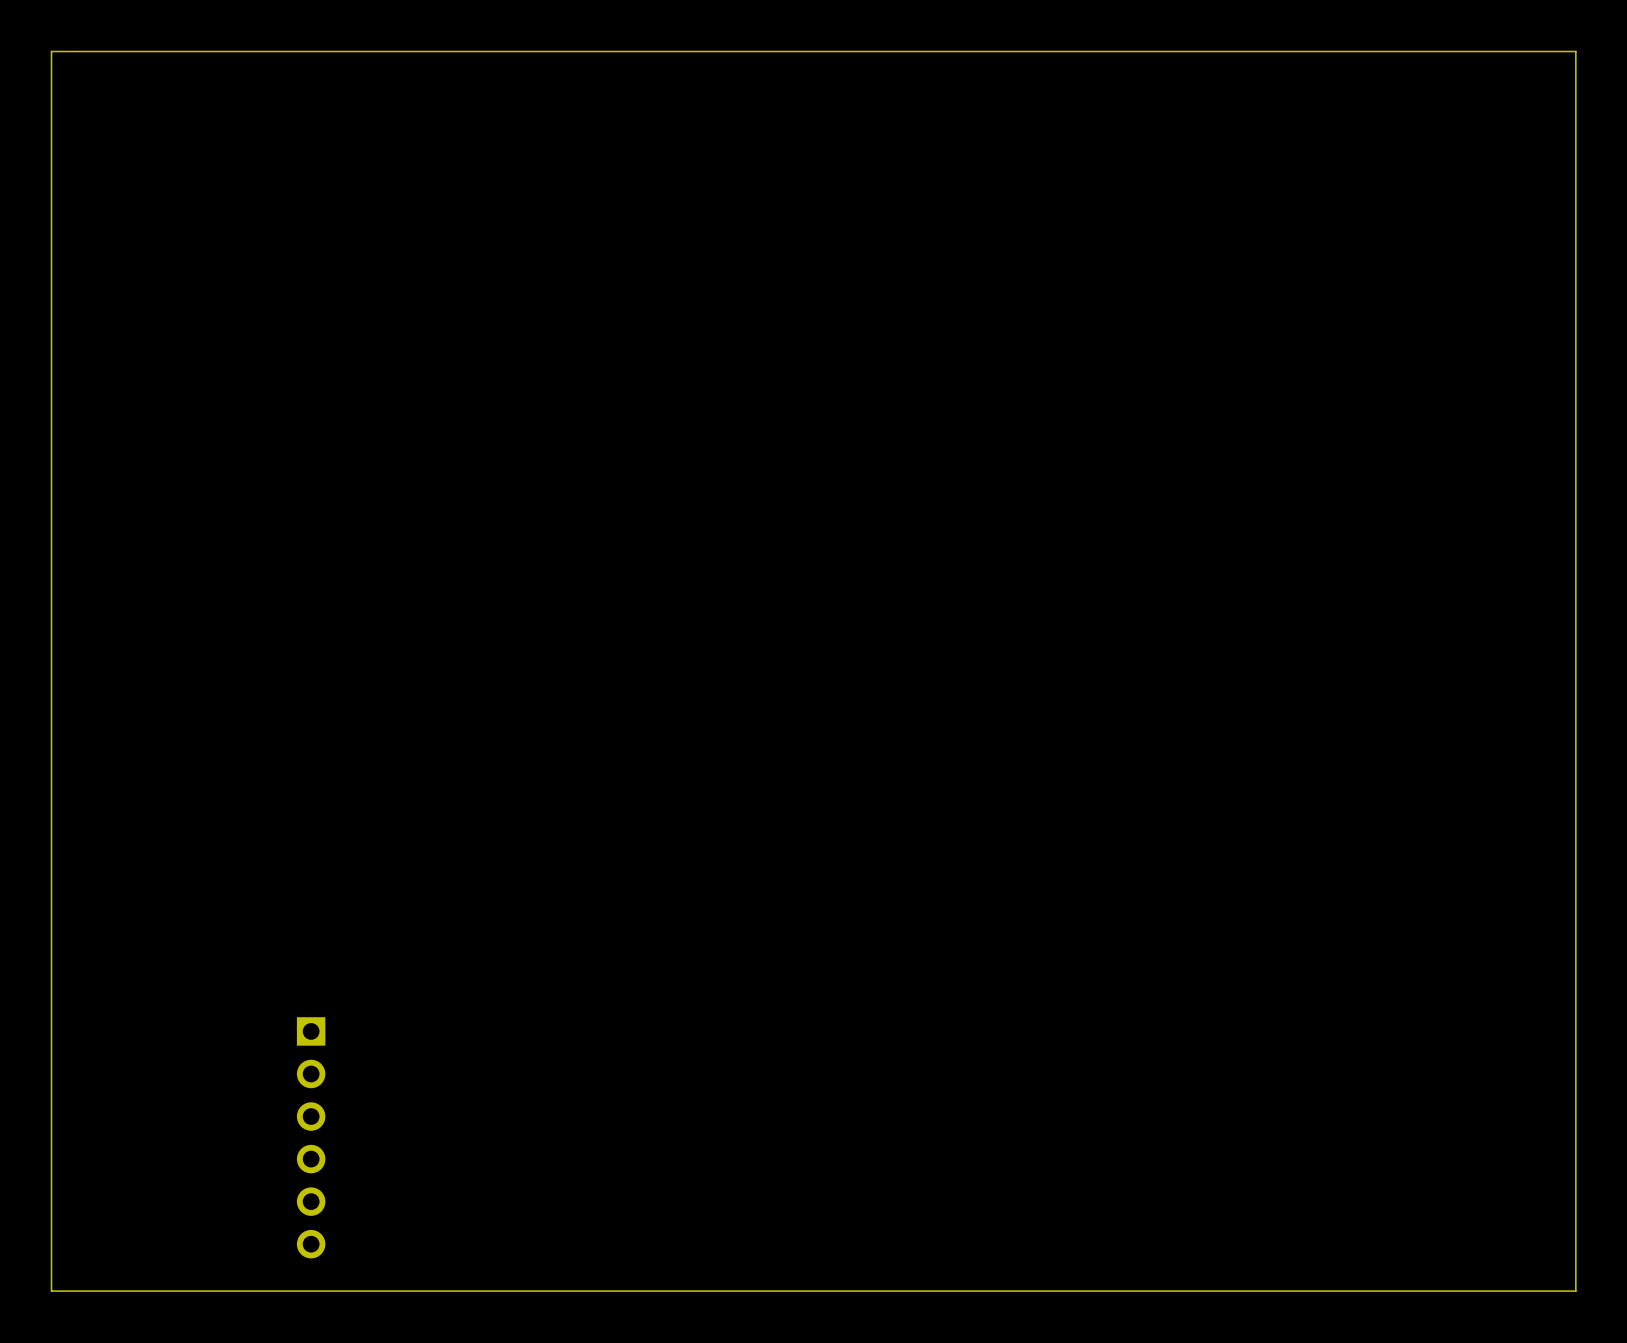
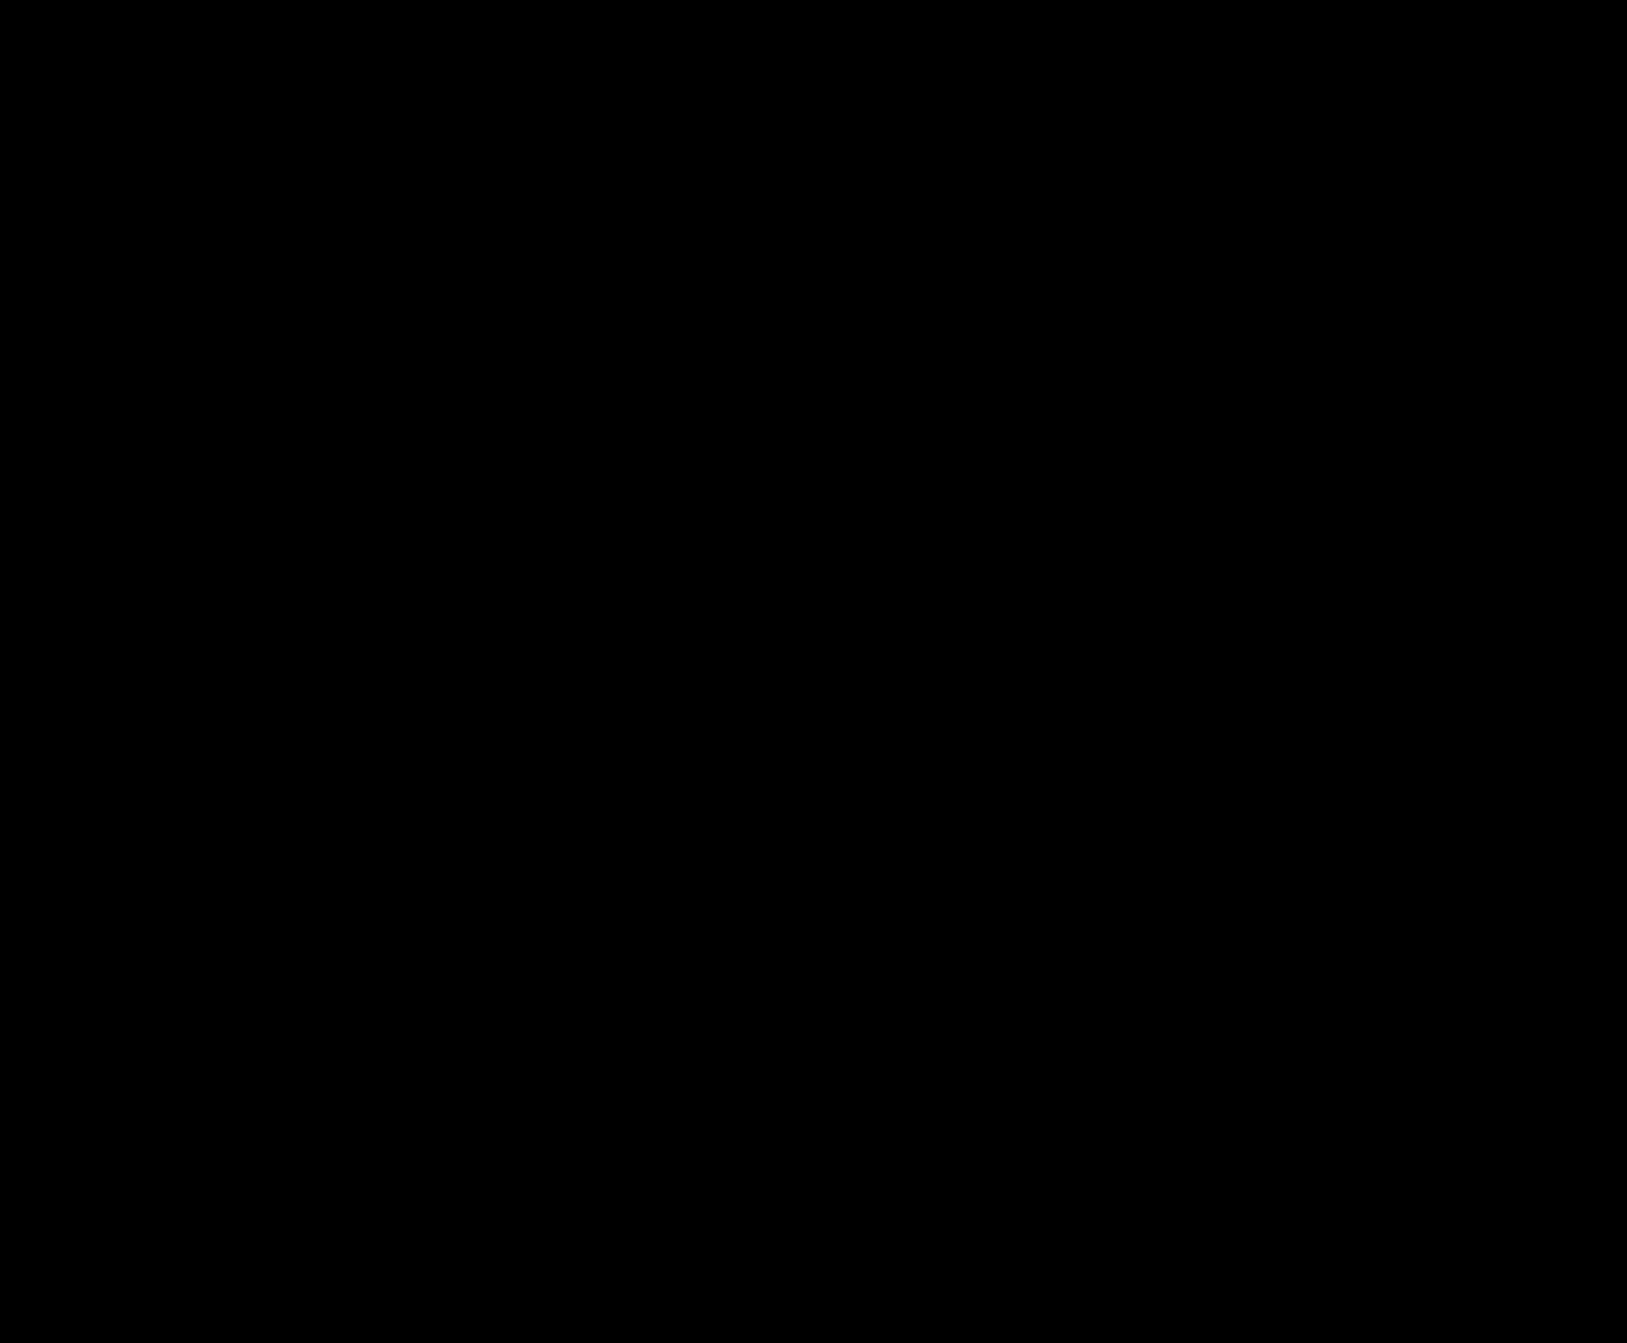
board edge: (1575, 51) (51, 51) (51, 1291) (1575, 1291) (1575, 51) -> none
part: (311, 1137) -> none

